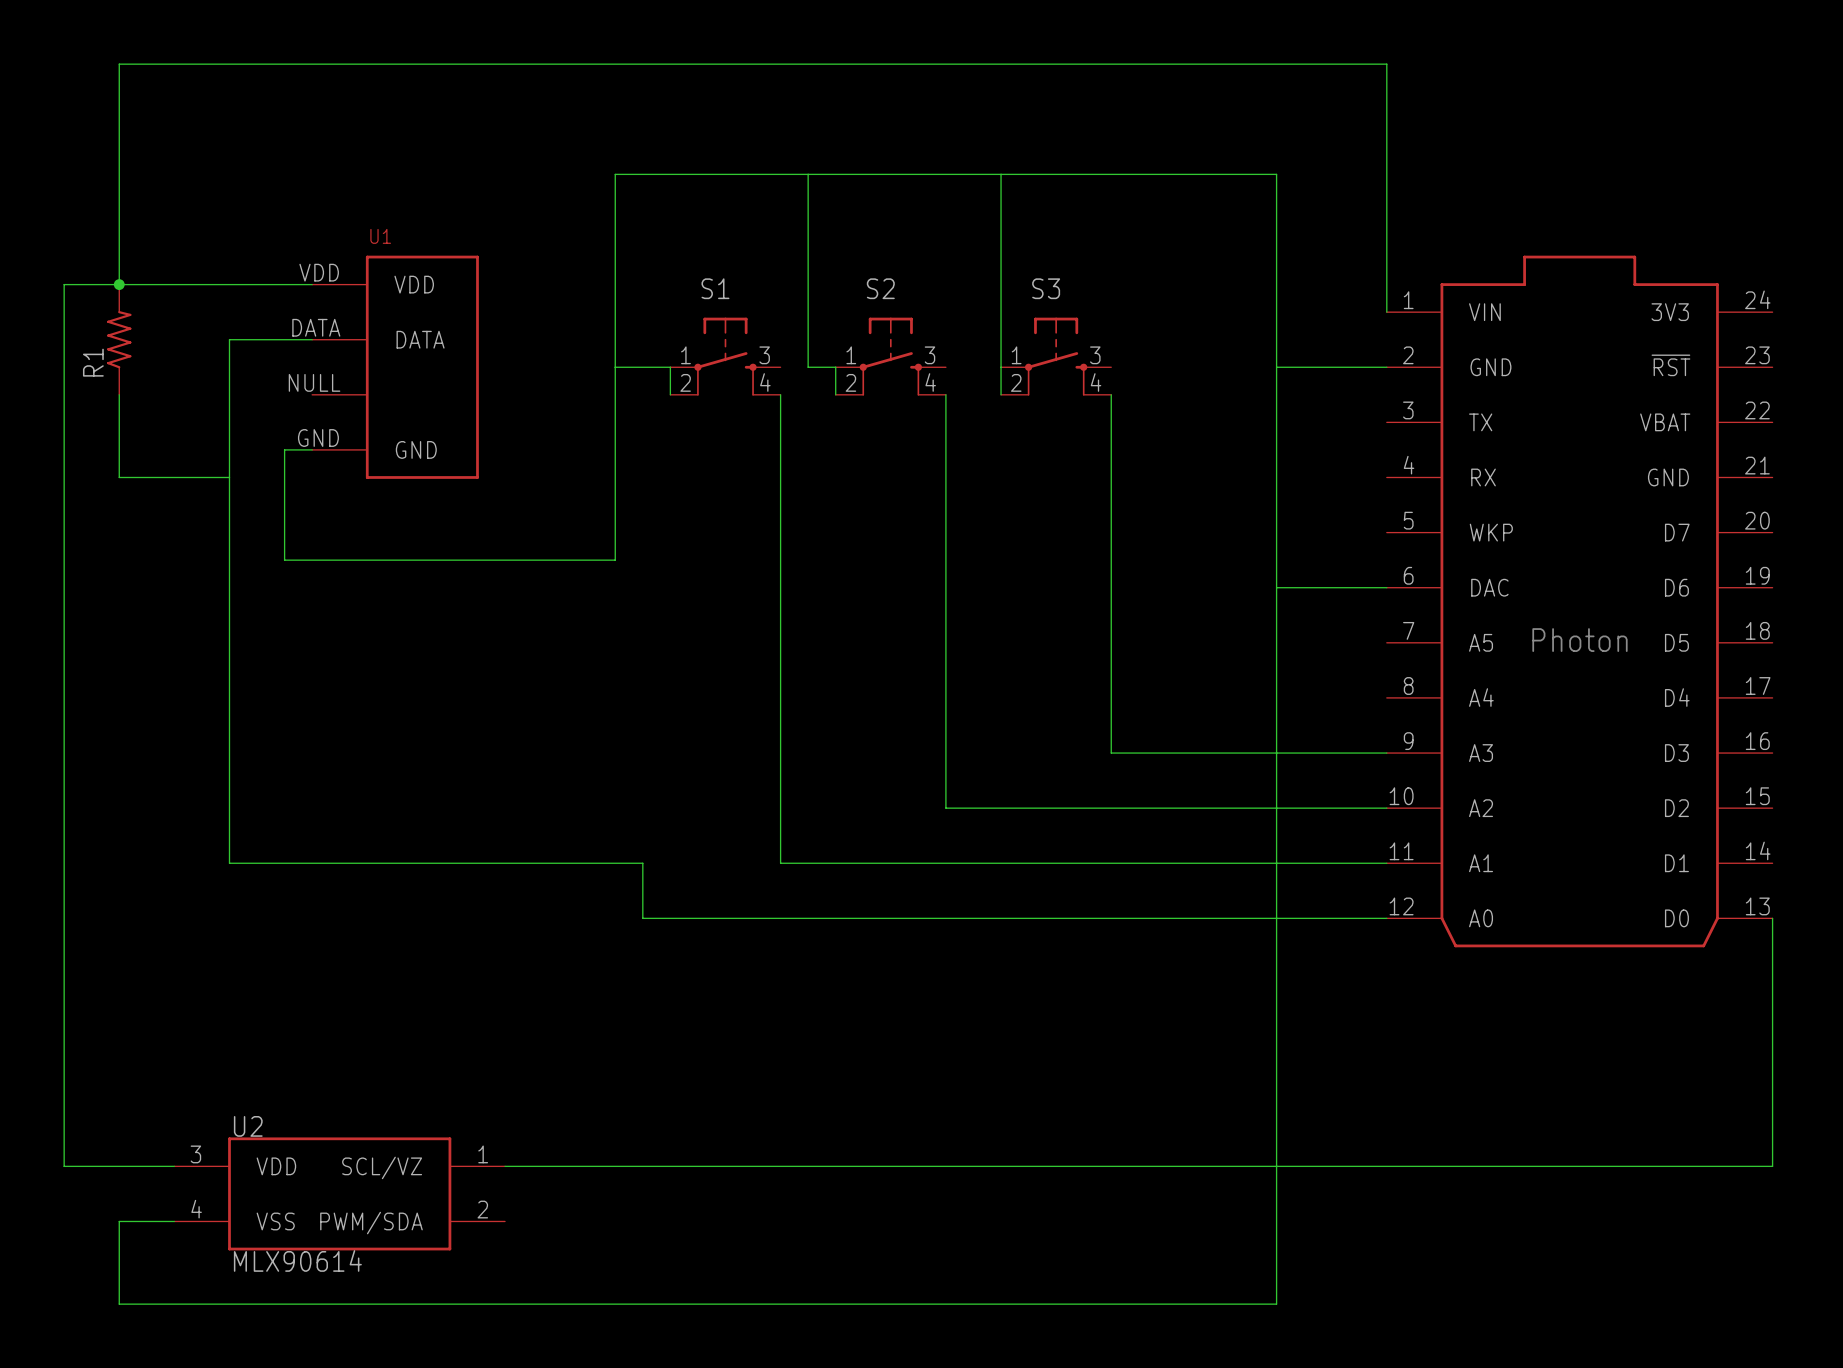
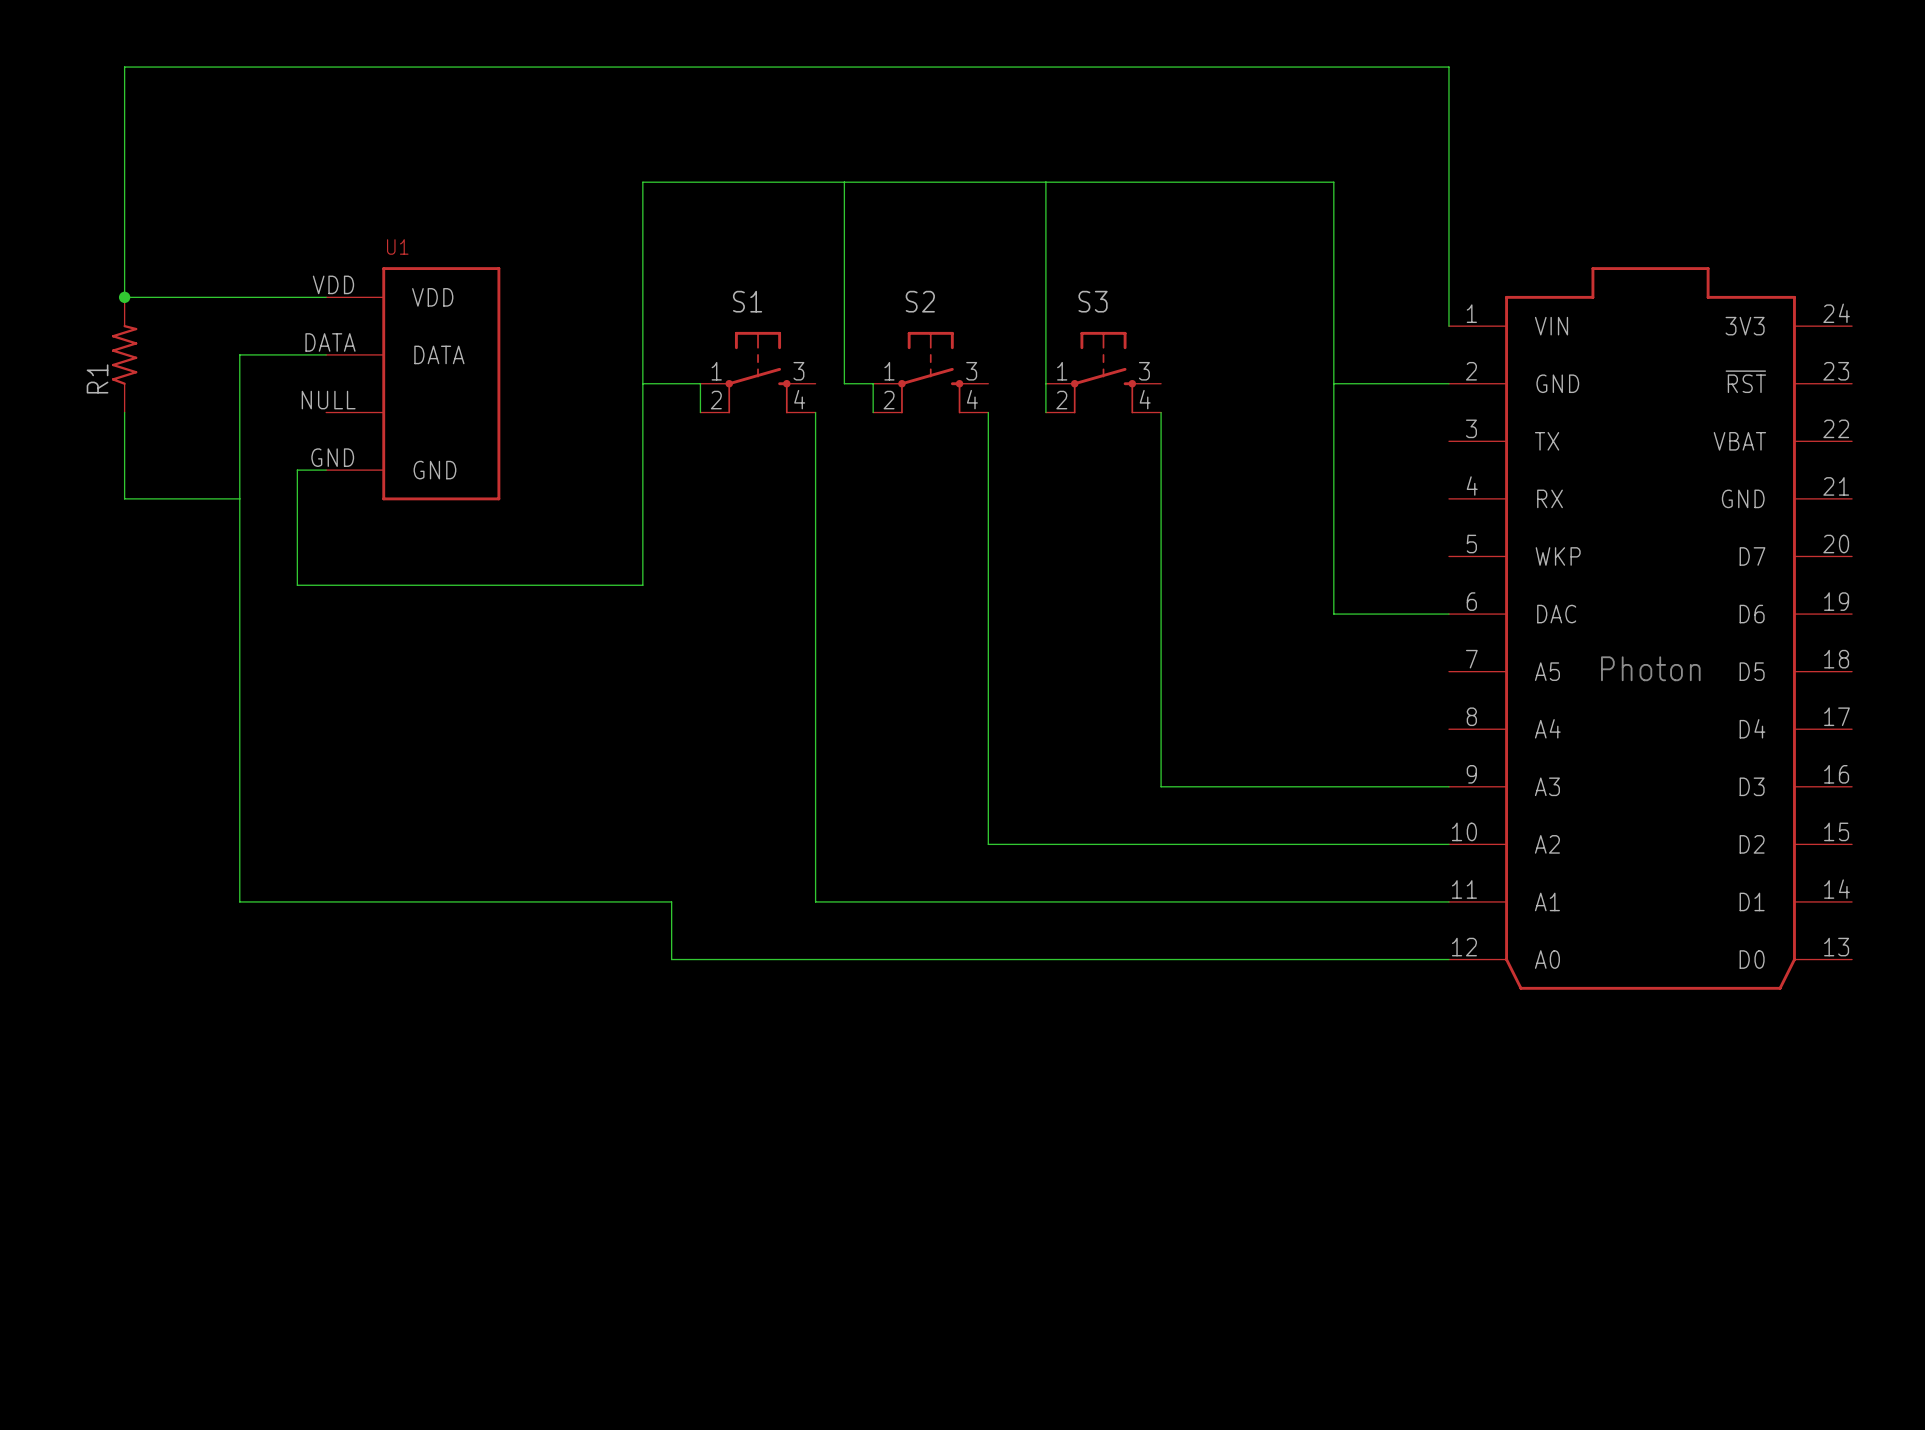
wire: (119, 284) (64, 284) (64, 1166) (174, 1166) -> none
wire: (1276, 587) (1276, 1304) (119, 1304) (119, 1221) (174, 1221) -> none
wire: (1772, 918) (1772, 1166) (505, 1166) -> none
U2: MLX90614 (339, 1193) -> none

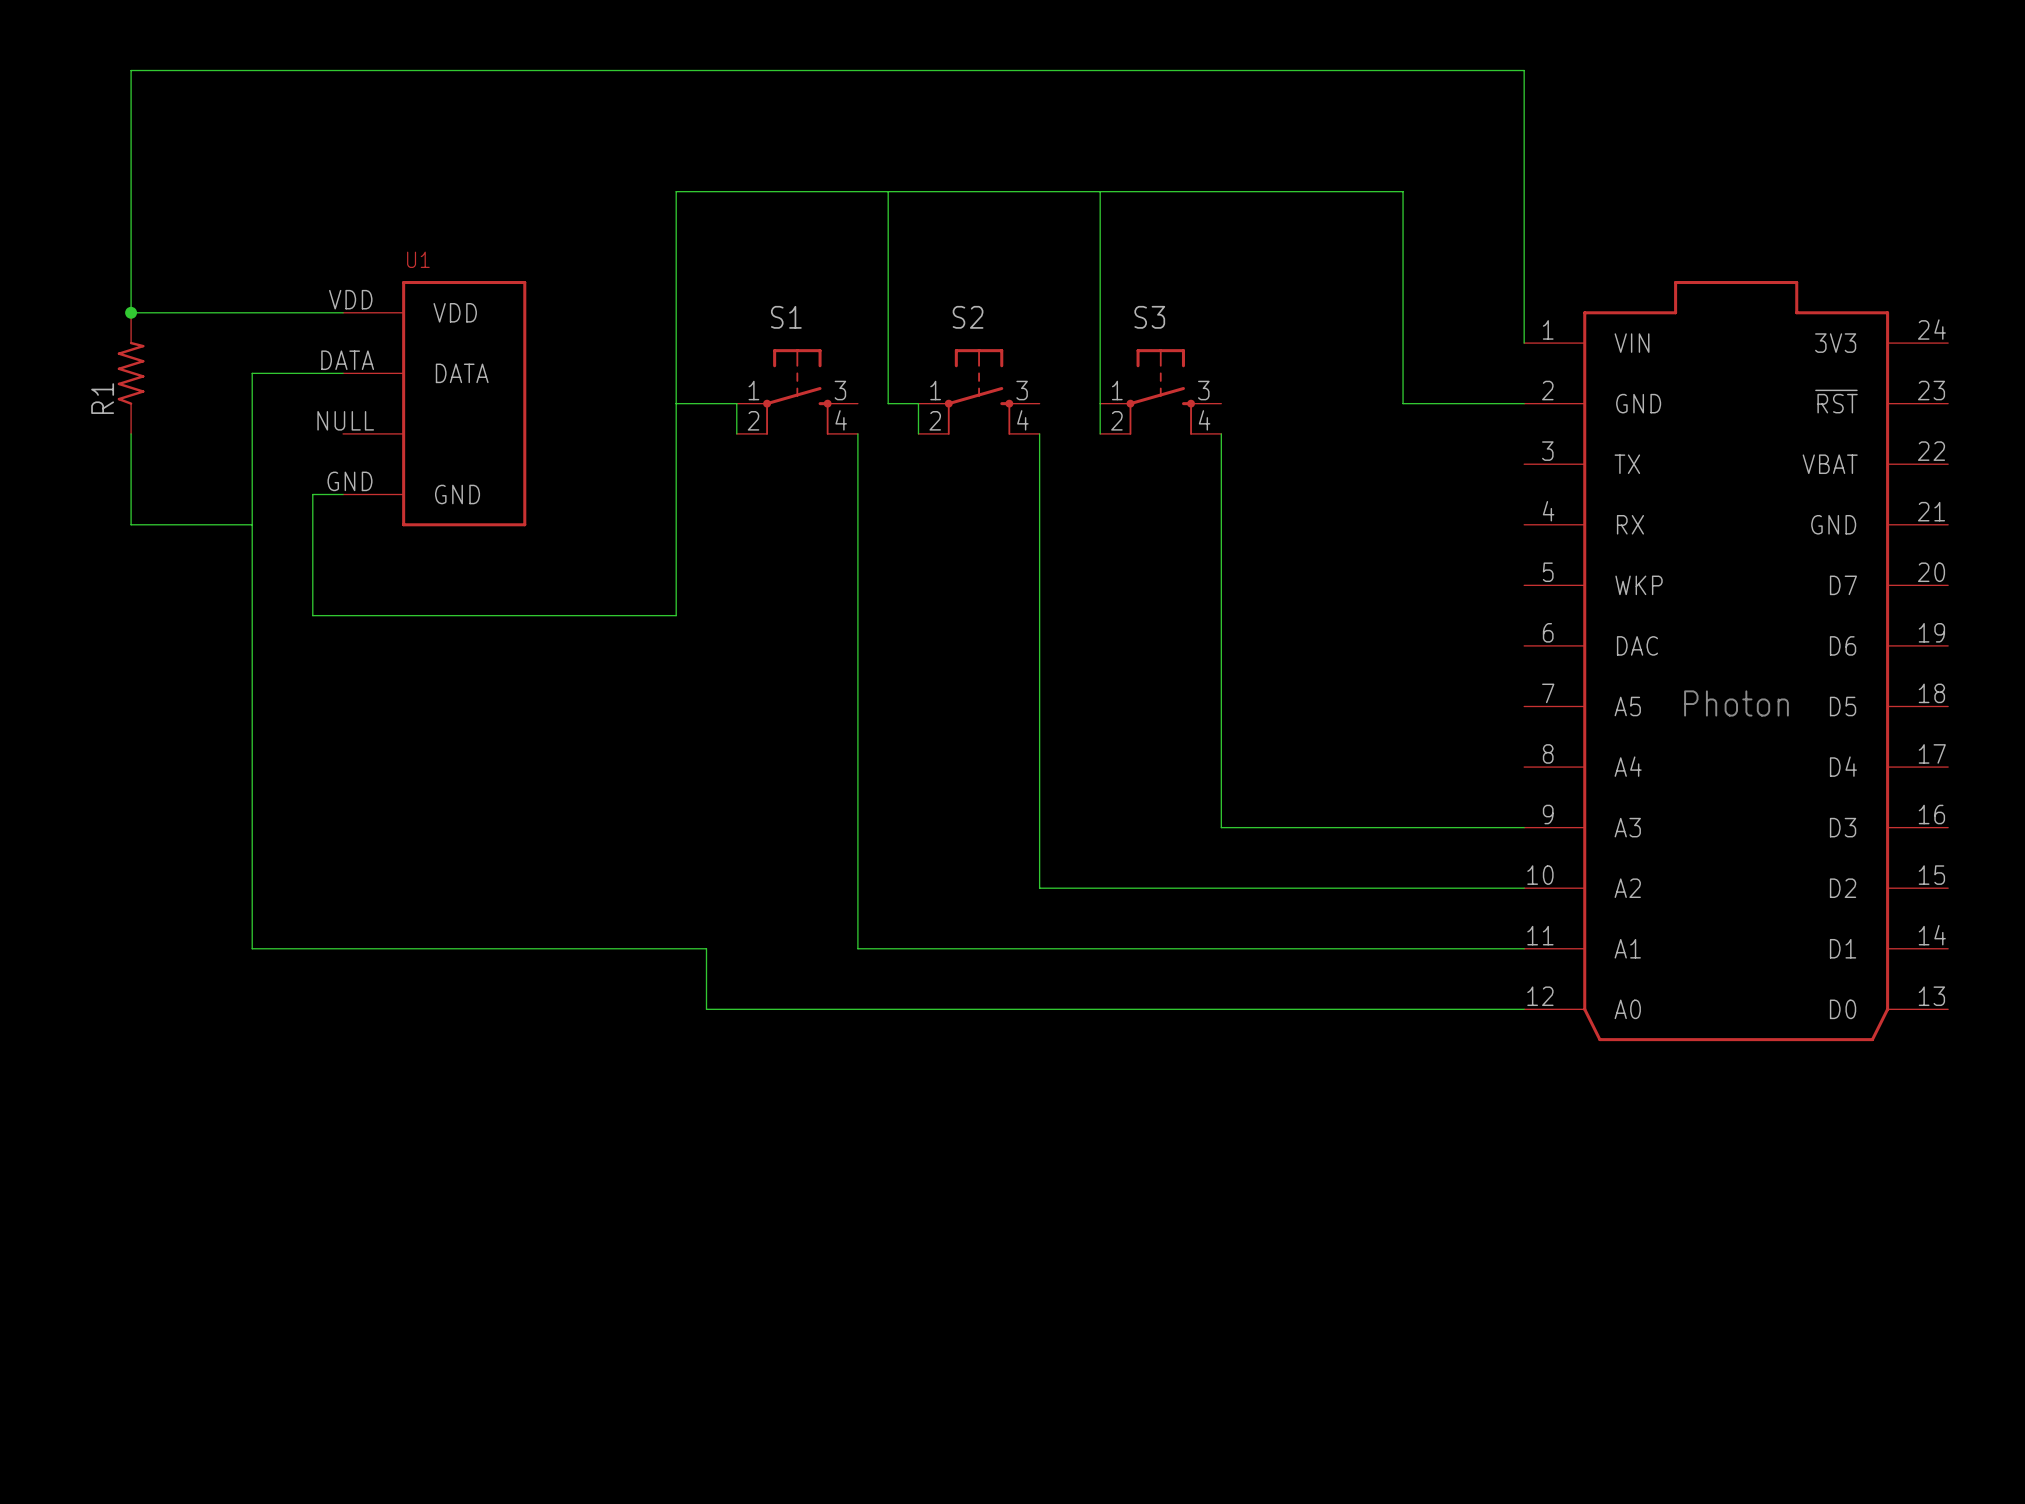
wire: (1333, 383) (1333, 614) (1448, 614) -> none

